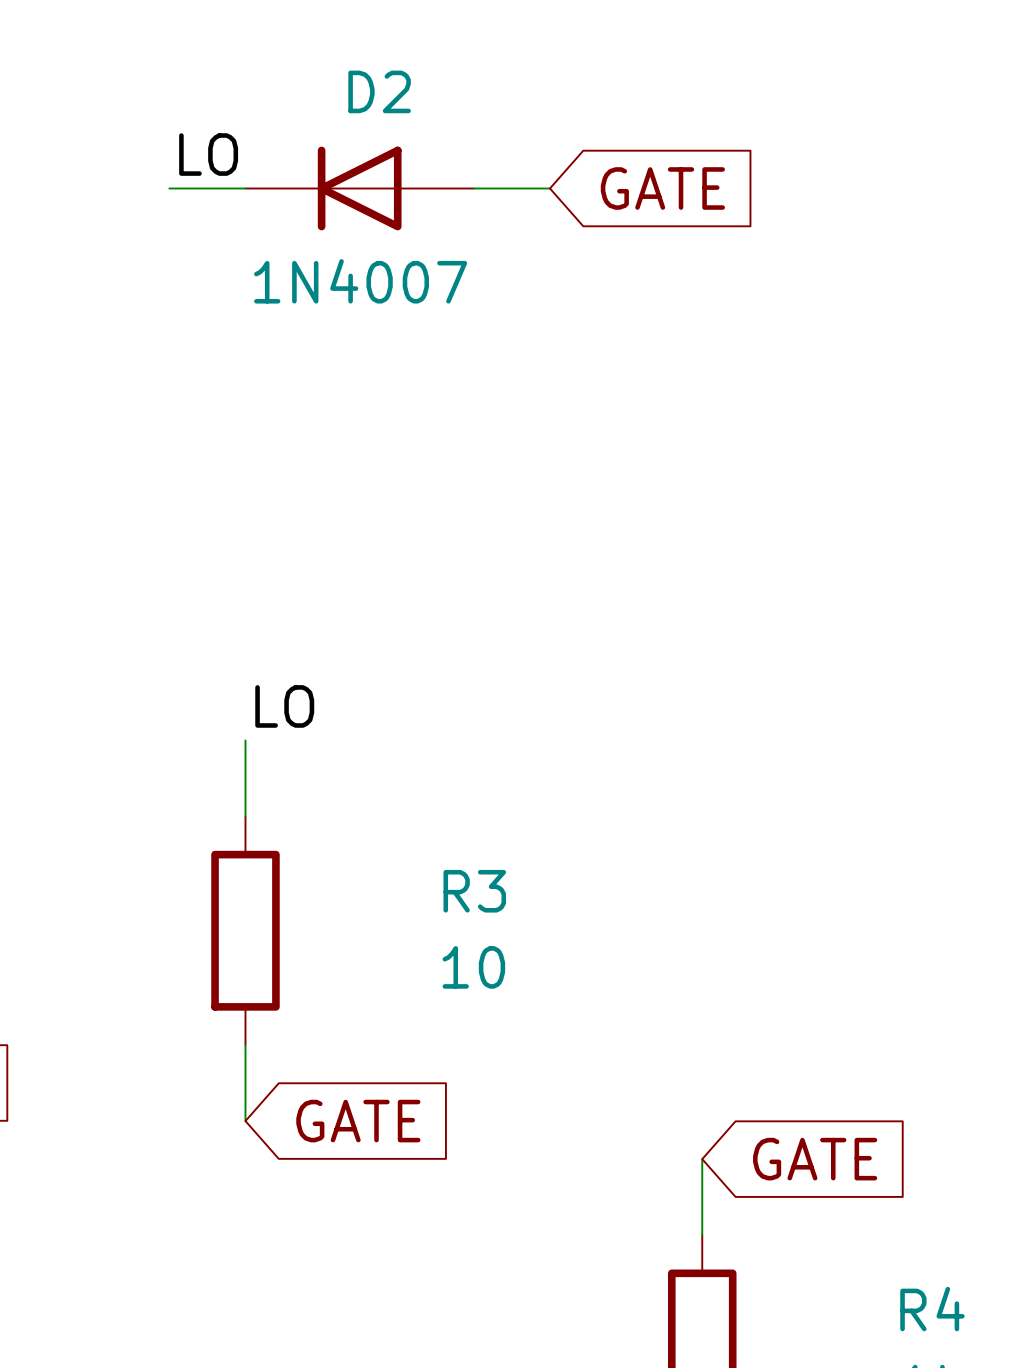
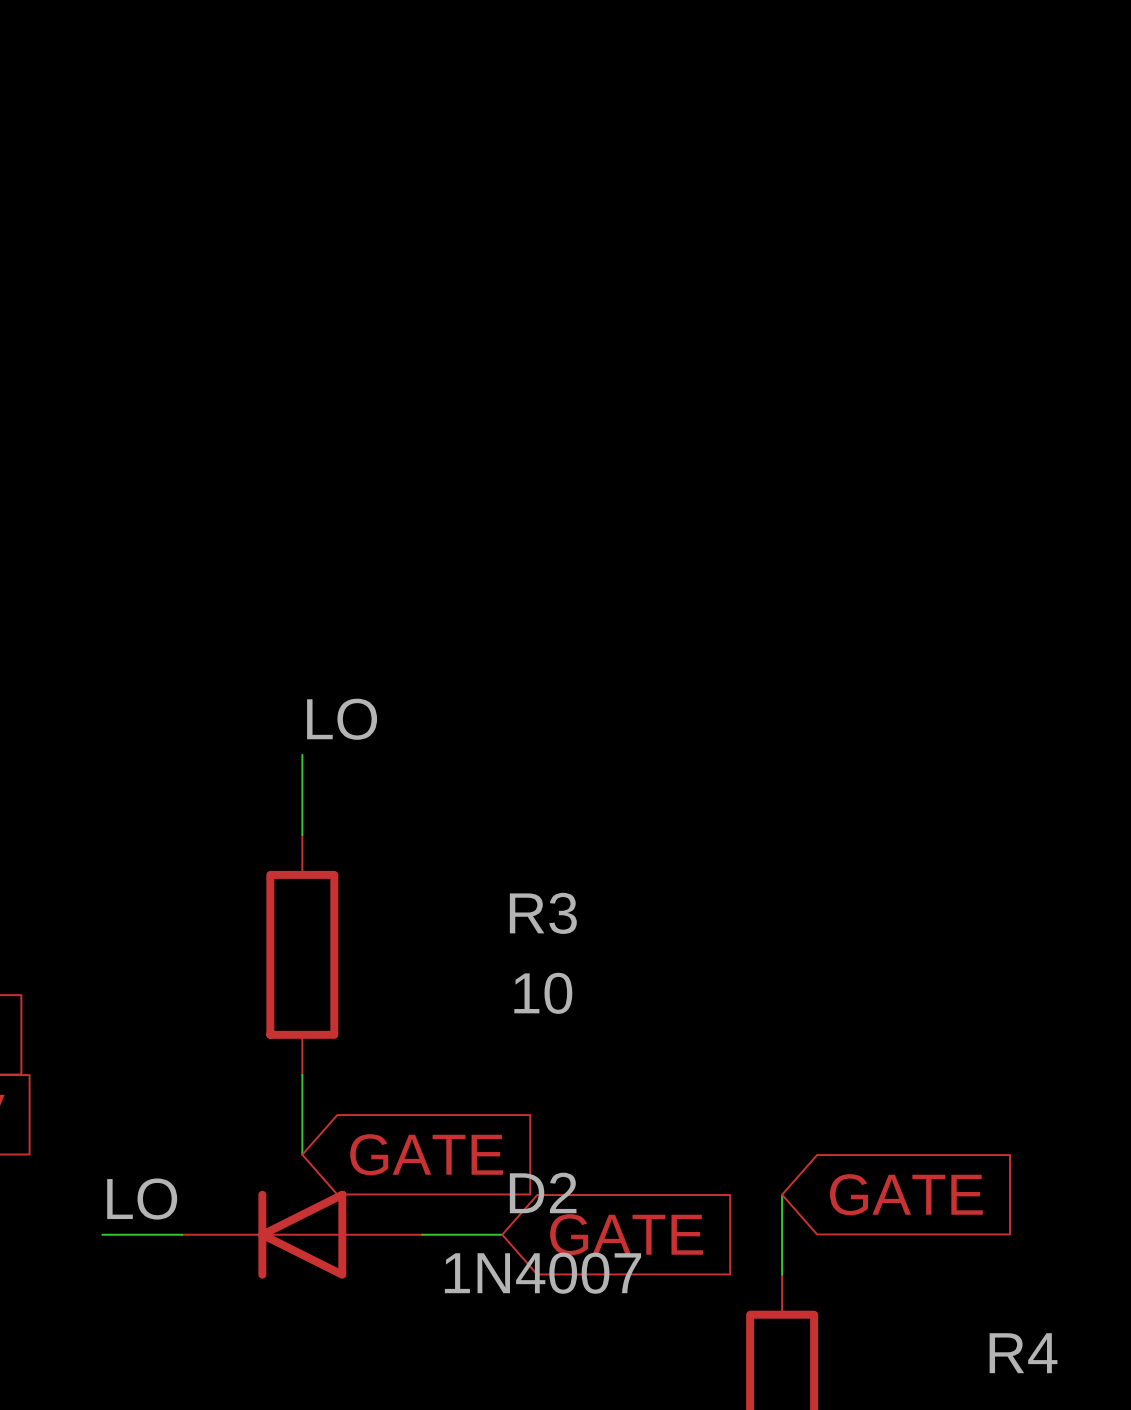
D2 name position: D2 (379, 91) -> D2 (543, 1192)
label: LO (208, 154) -> none
wire: (169, 188) (245, 188) -> none
D2 position: (359, 188) -> (302, 1234)
wire: (473, 188) (549, 188) -> none
global label: GATE (662, 188) -> none
D2 value position: 1N4007 (360, 281) -> 1N4007 (542, 1273)
label: none -> LO (142, 1199)
wire: none -> (102, 1234) (182, 1234)
wire: none -> (422, 1234) (502, 1234)
global label: none -> GATE (626, 1234)

